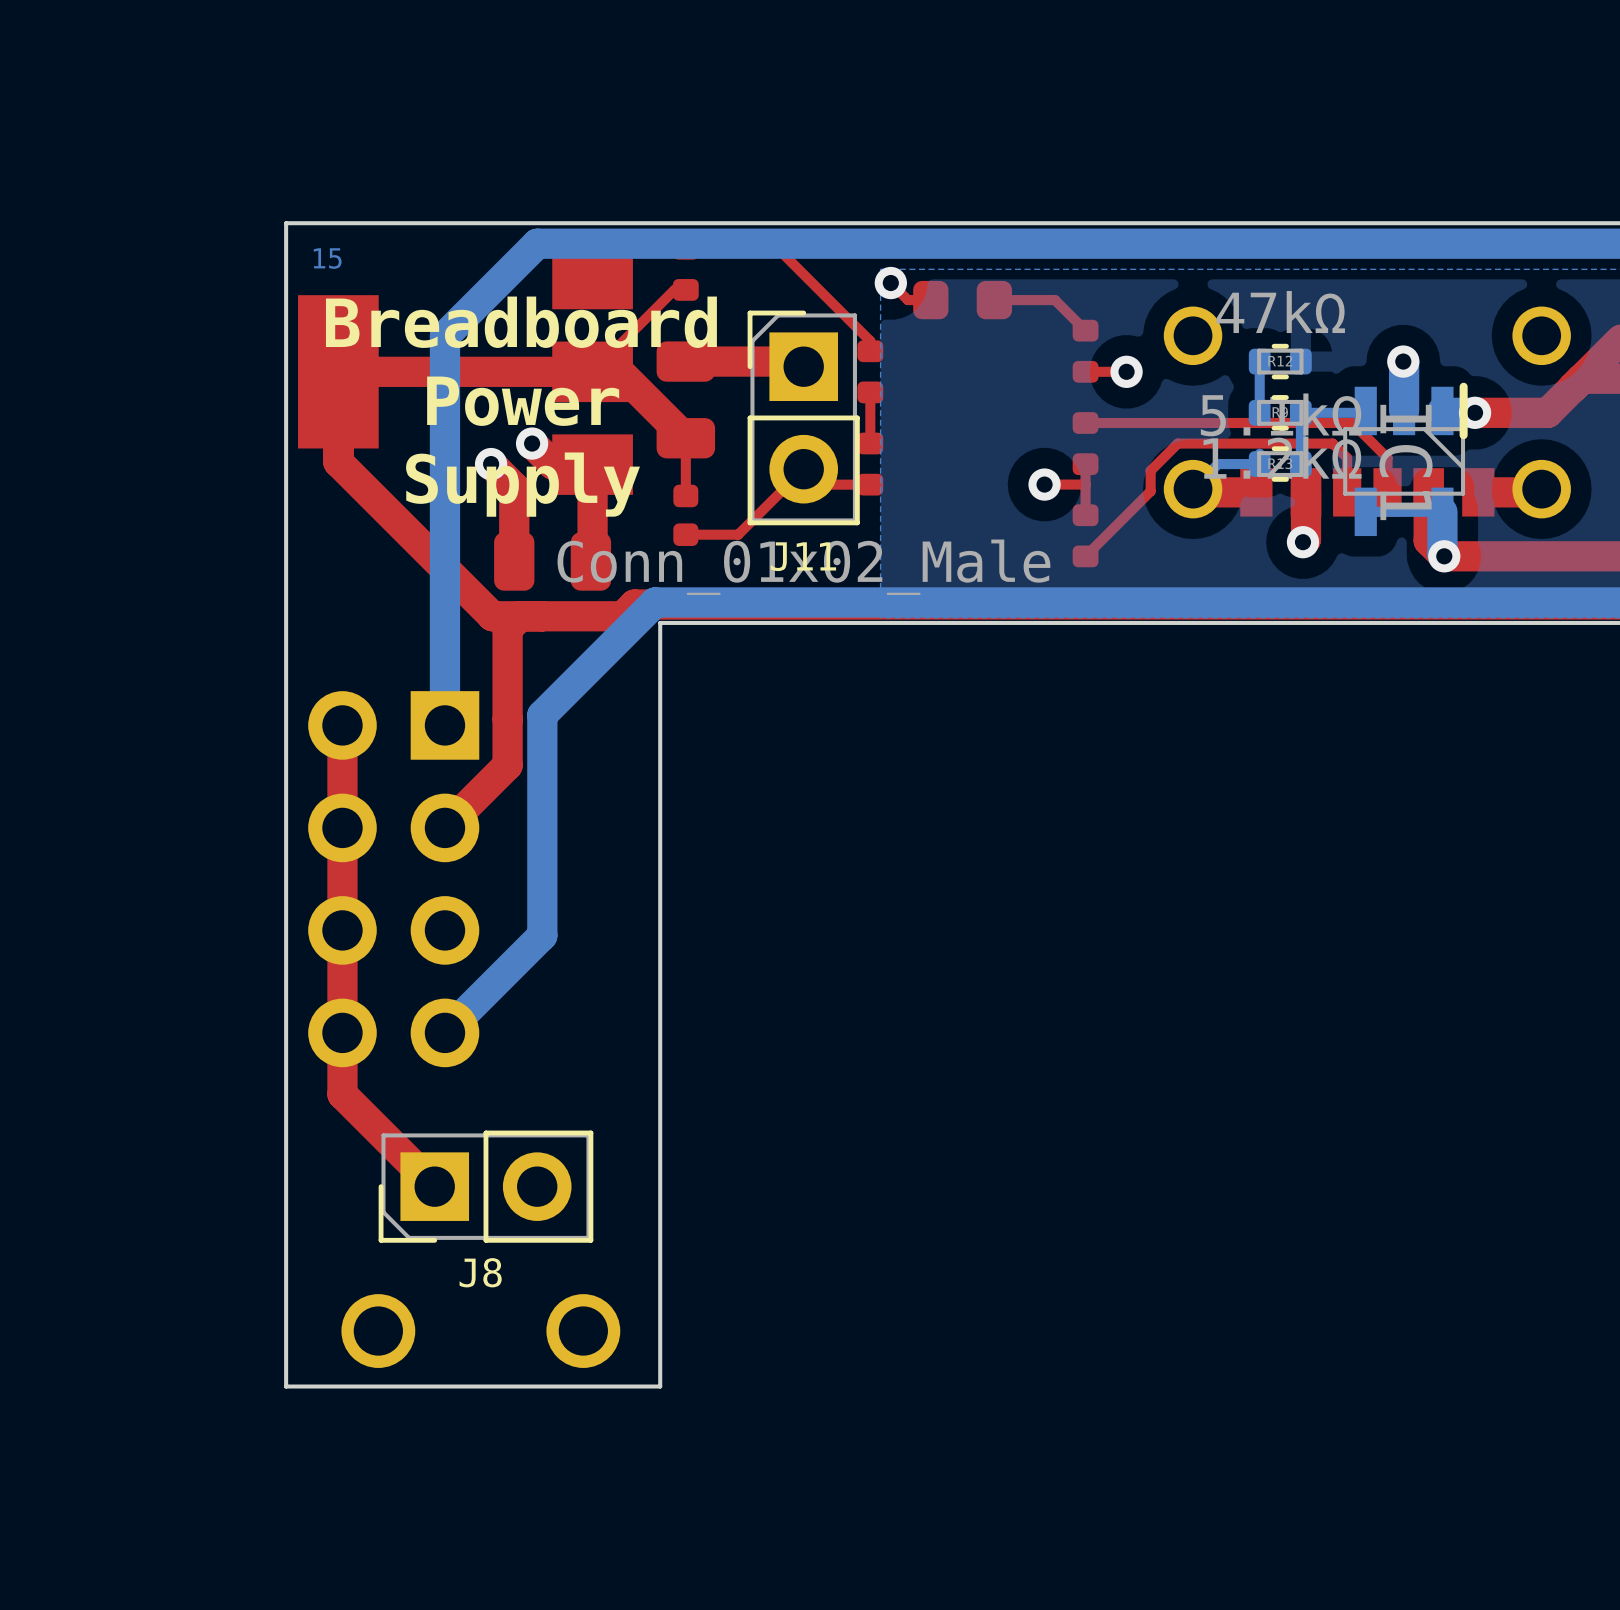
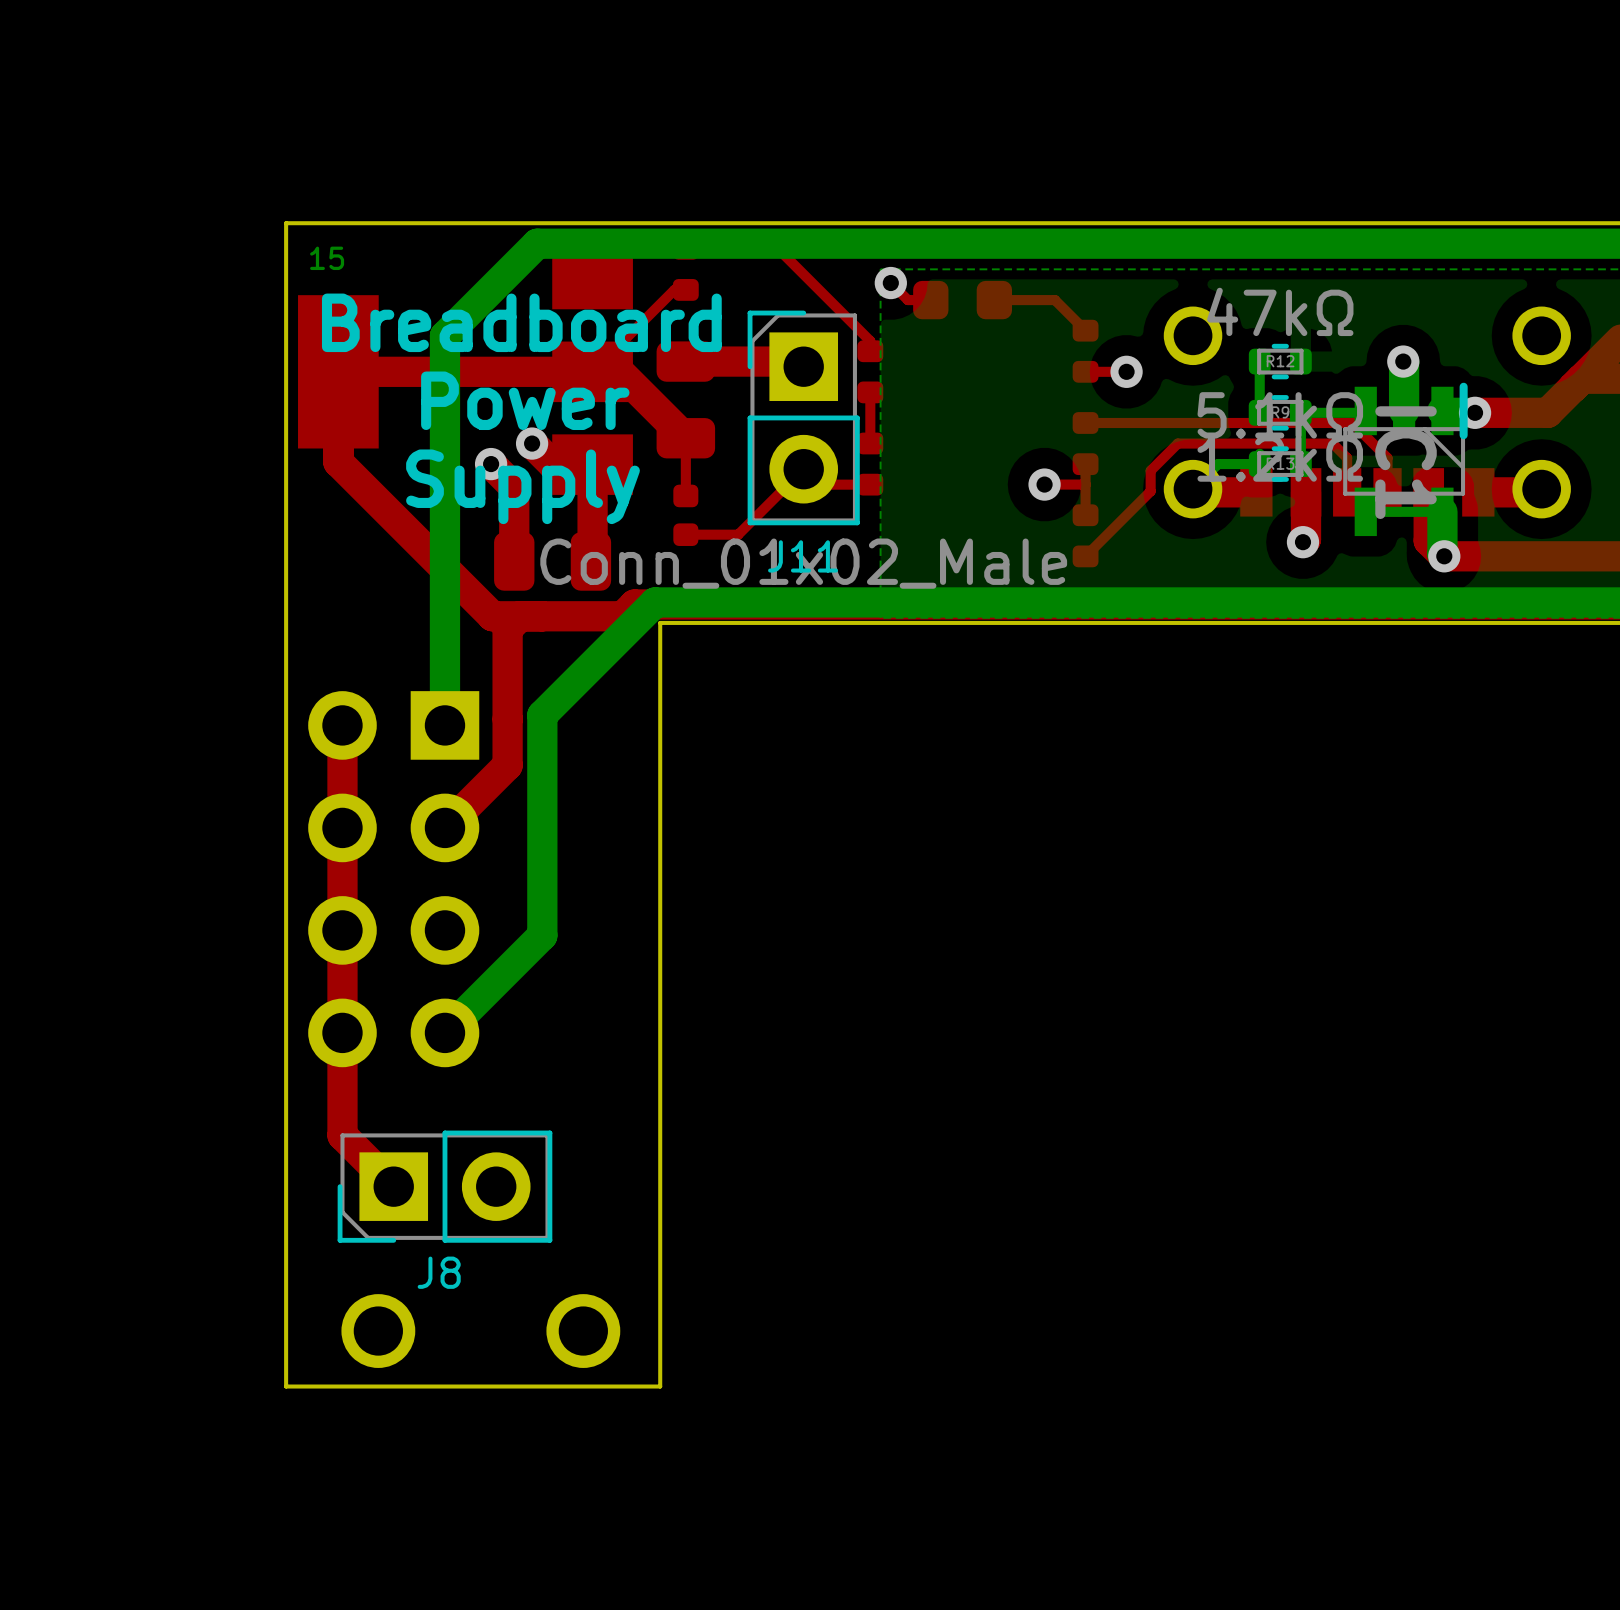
top track: (342, 1094) (434, 1186) -> (342, 1094) (342, 1135) (393, 1186)
J8 position: (485, 1186) -> (444, 1186)

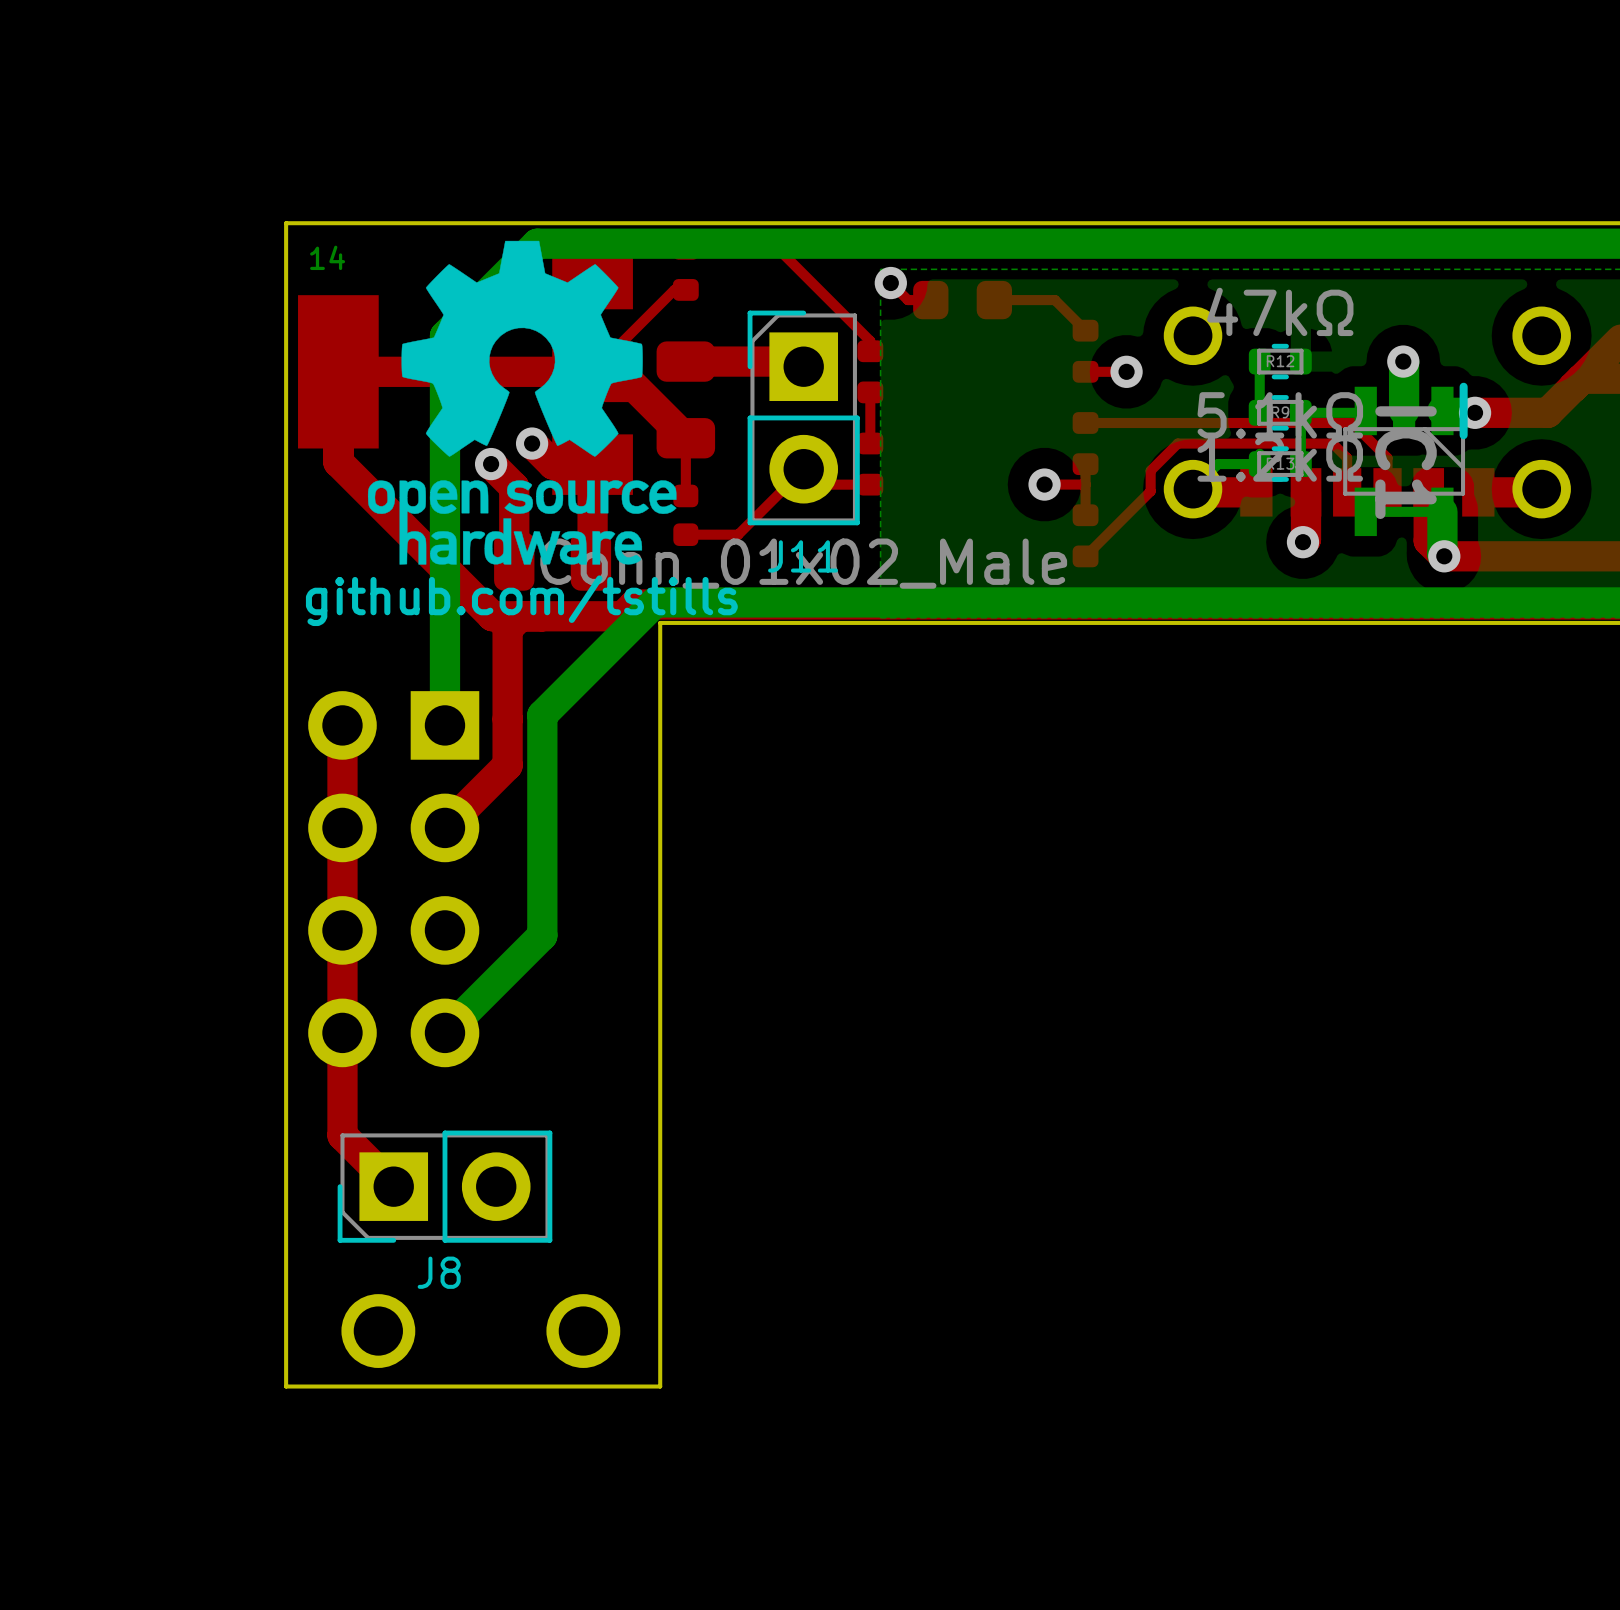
drawing: none -> [367, 240, 677, 565]
text: 15 (327, 258) -> 14 (327, 257)
text: Breadboard (521, 322) -> none
text: Power (525, 400) -> none
text: Supply (523, 486) -> none
text: none -> github.com/tstills (521, 600)

